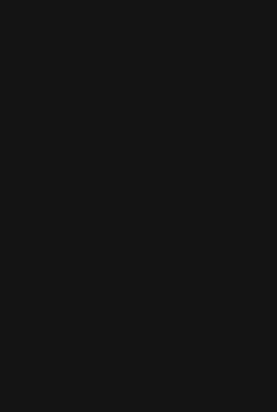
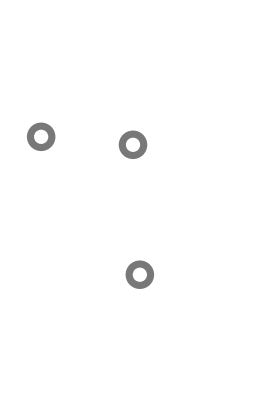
via: none -> (41, 136)
via: none -> (133, 144)
via: none -> (139, 274)

